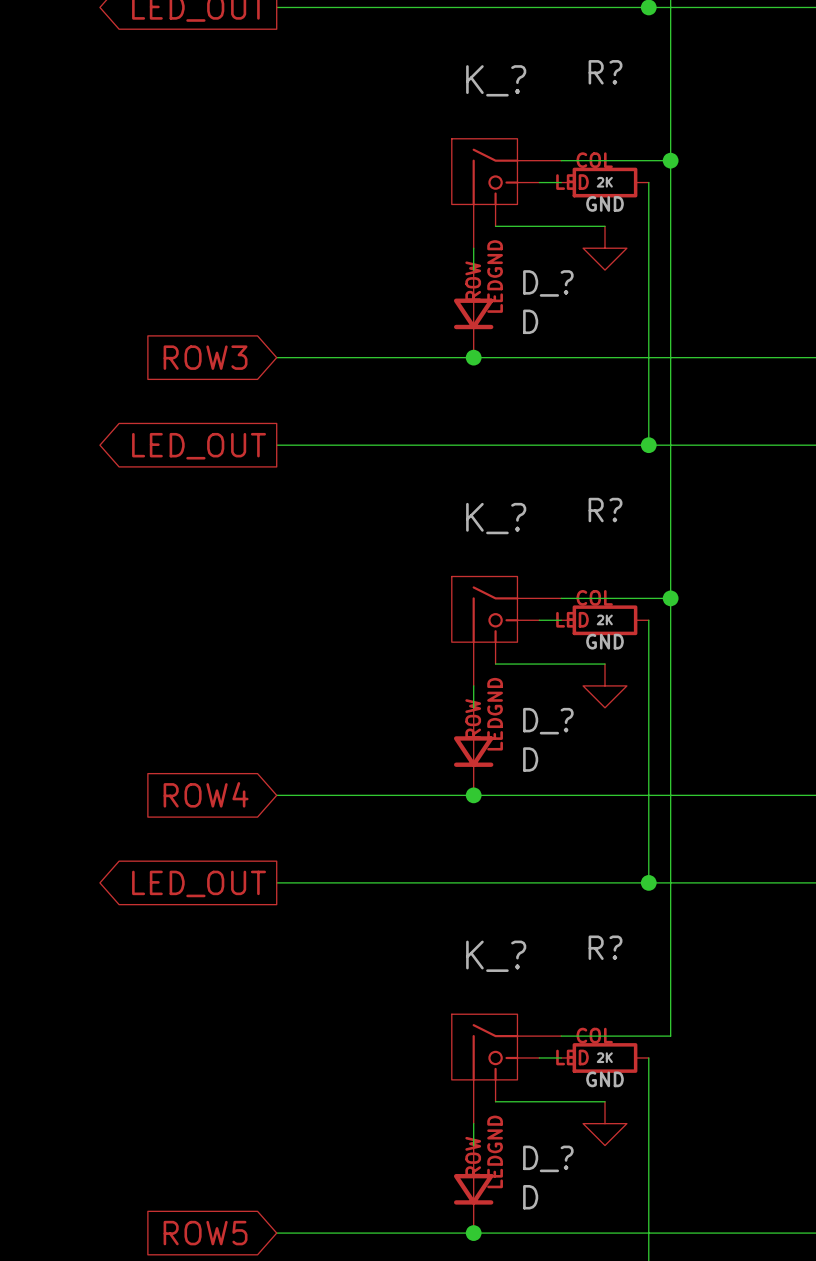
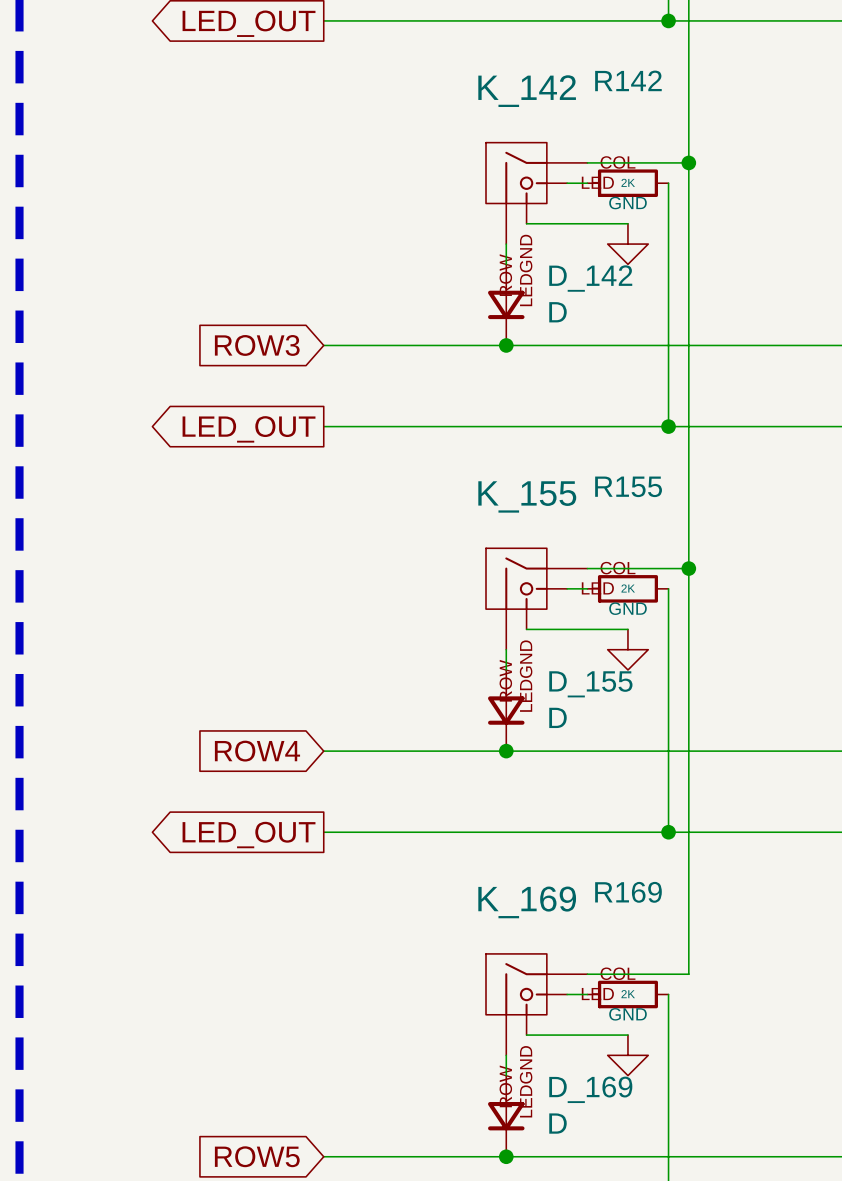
R? name: R? (605, 72) -> R142 (628, 80)
K_? name: K_? (496, 80) -> K_142 (527, 91)
D_? name: D_? (548, 283) -> D_142 (590, 278)
R? name: R? (605, 510) -> R155 (628, 486)
K_? name: K_? (496, 518) -> K_155 (527, 496)
D_? name: D_? (548, 721) -> D_155 (590, 684)
R? name: R? (605, 947) -> R169 (628, 892)
K_? name: K_? (496, 956) -> K_169 (527, 902)
D_? name: D_? (548, 1158) -> D_169 (590, 1089)

